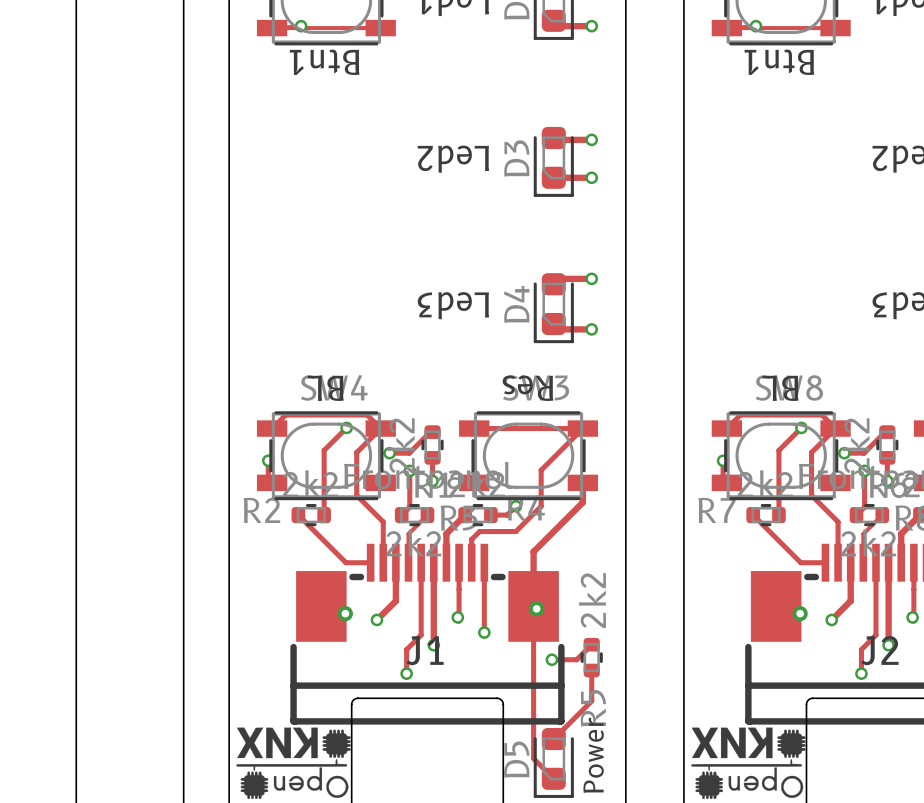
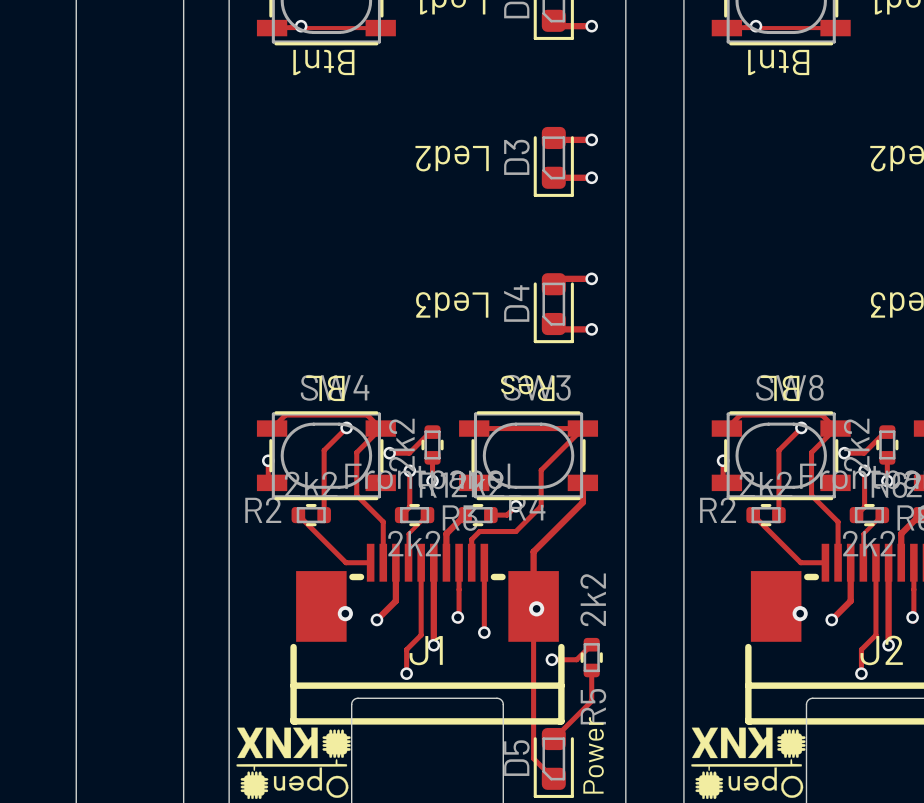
R7 name: R7 (717, 510) -> R2 (718, 510)

